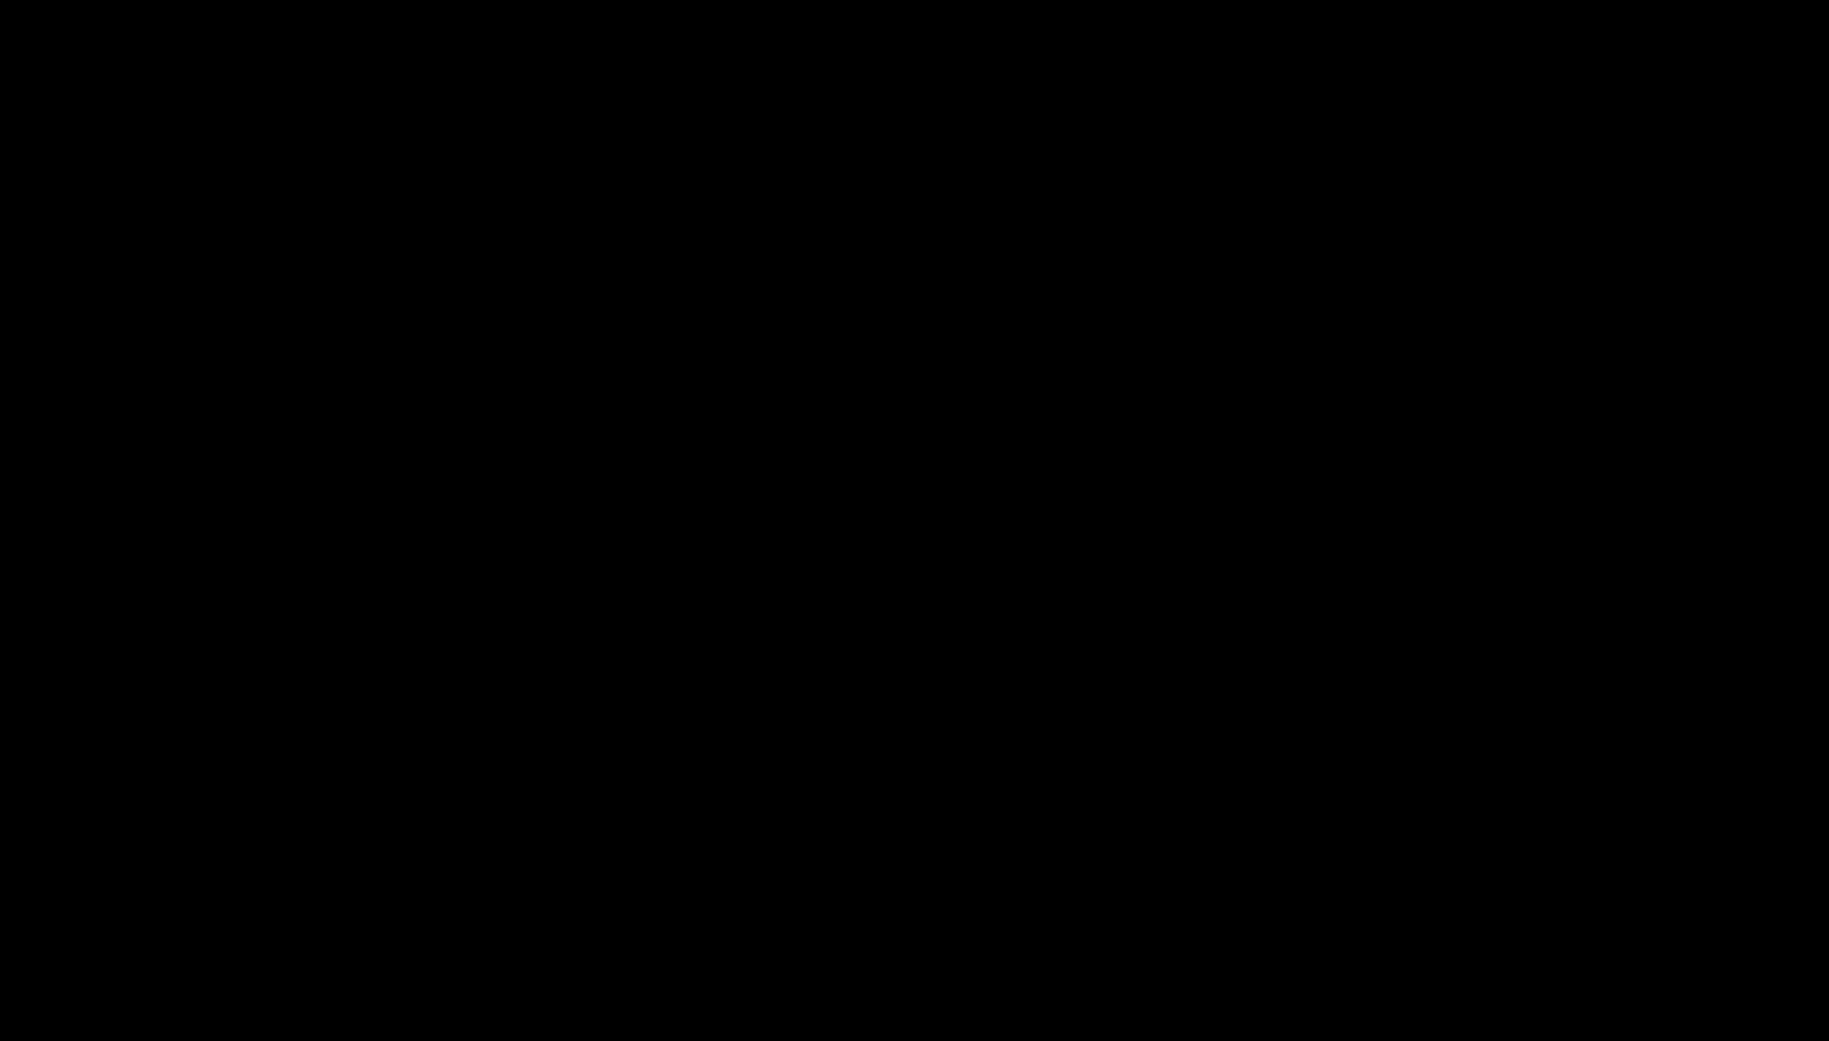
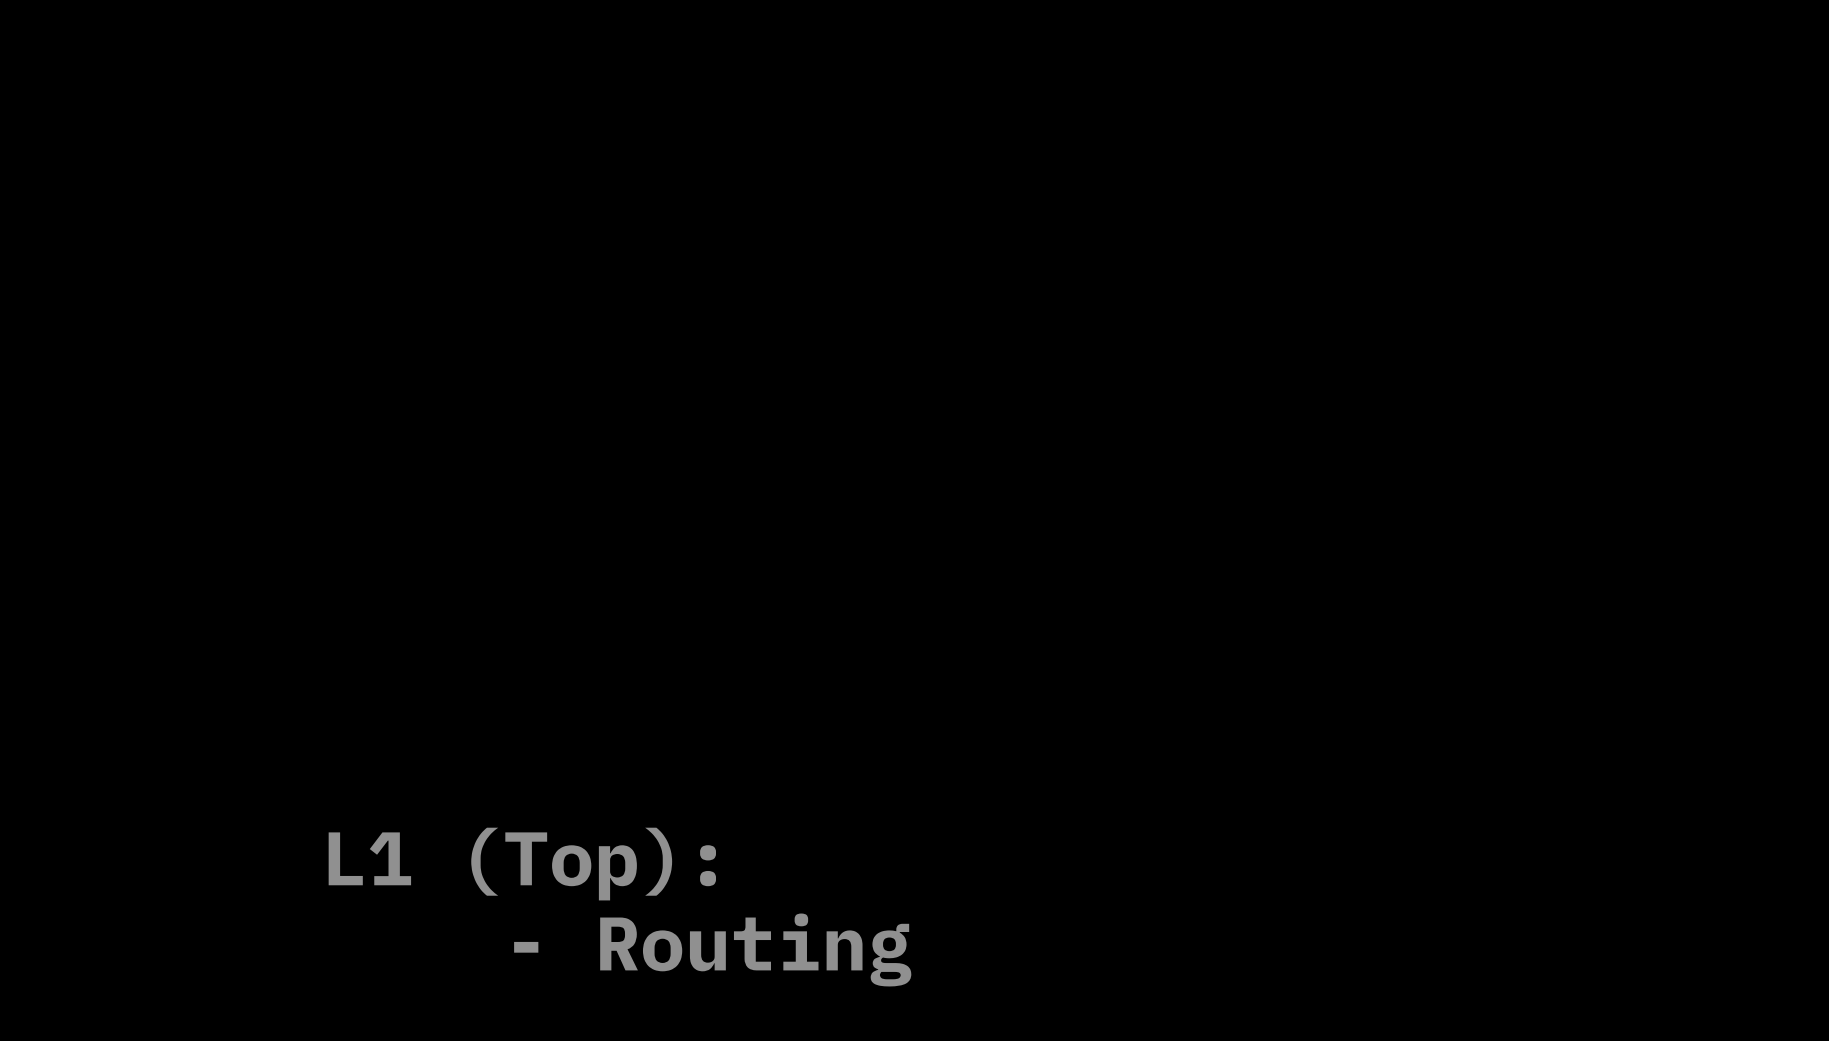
text: none -> L1 (Top): (522, 864)
text: none -> - Routing (712, 949)

